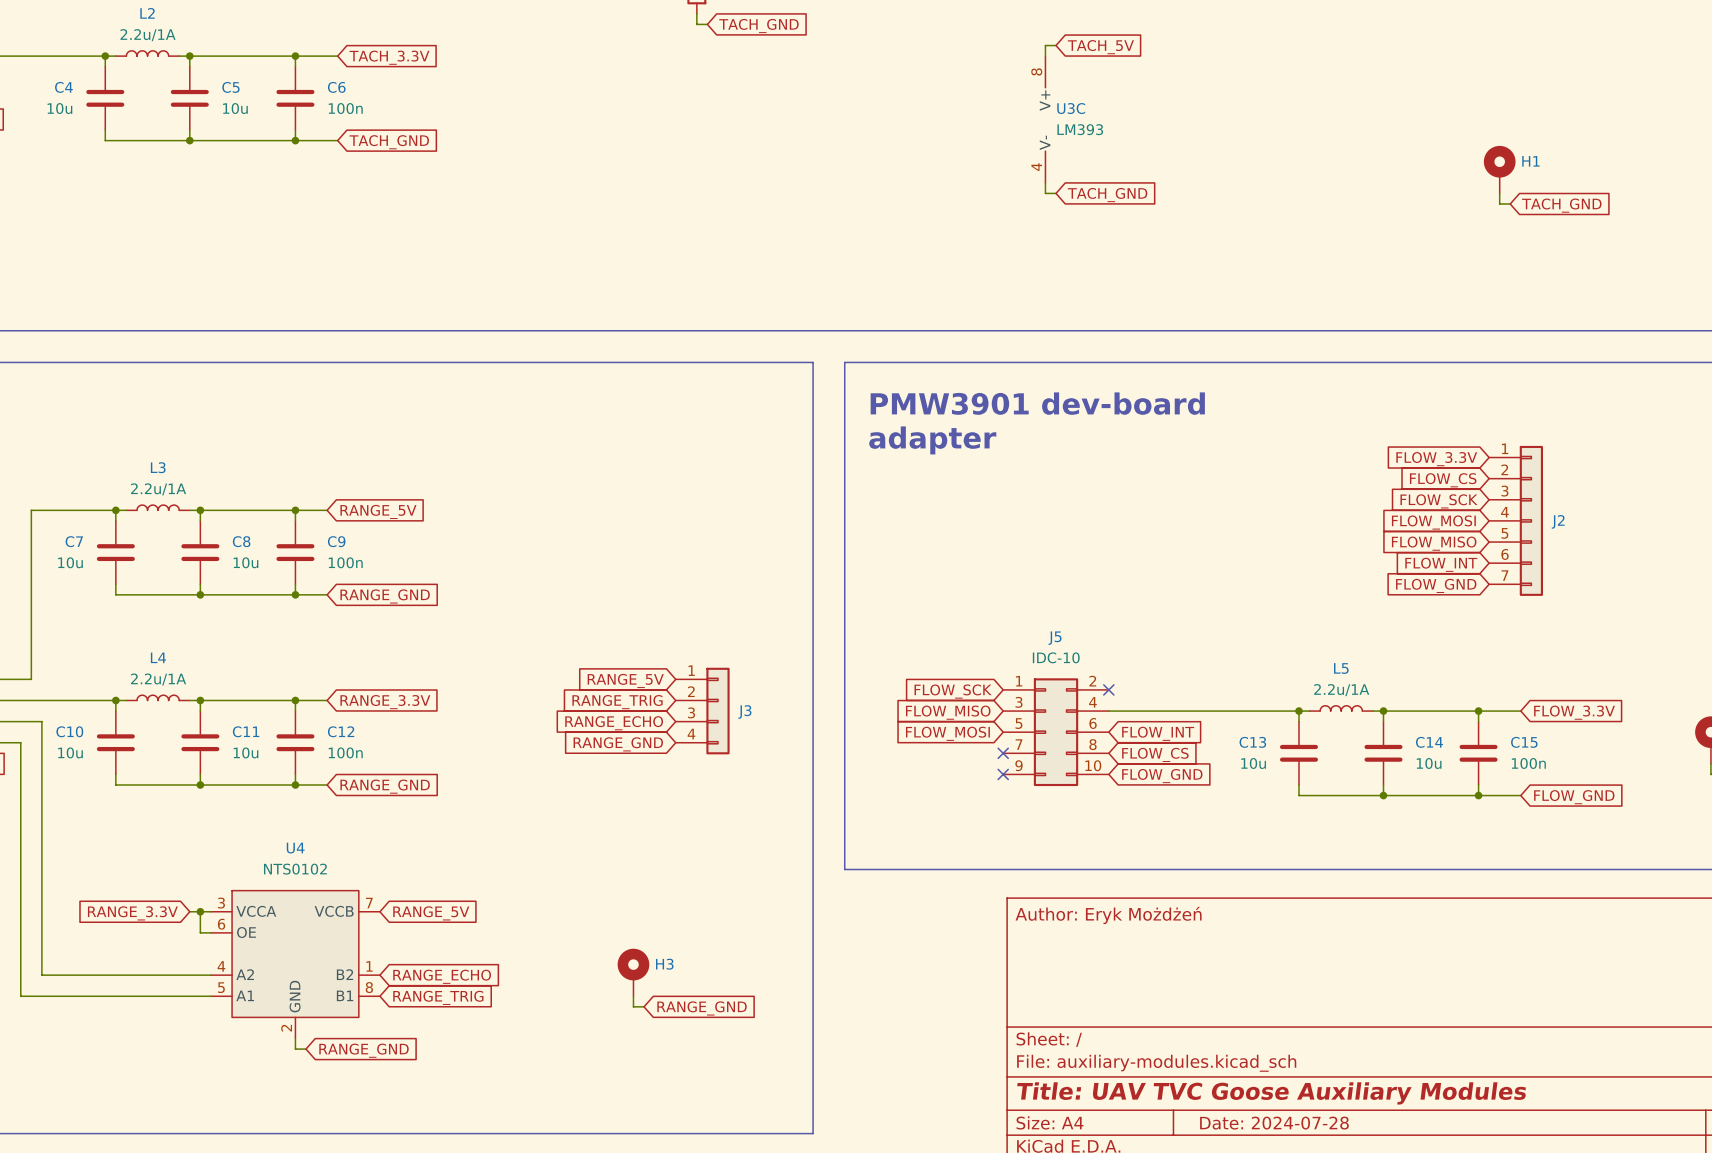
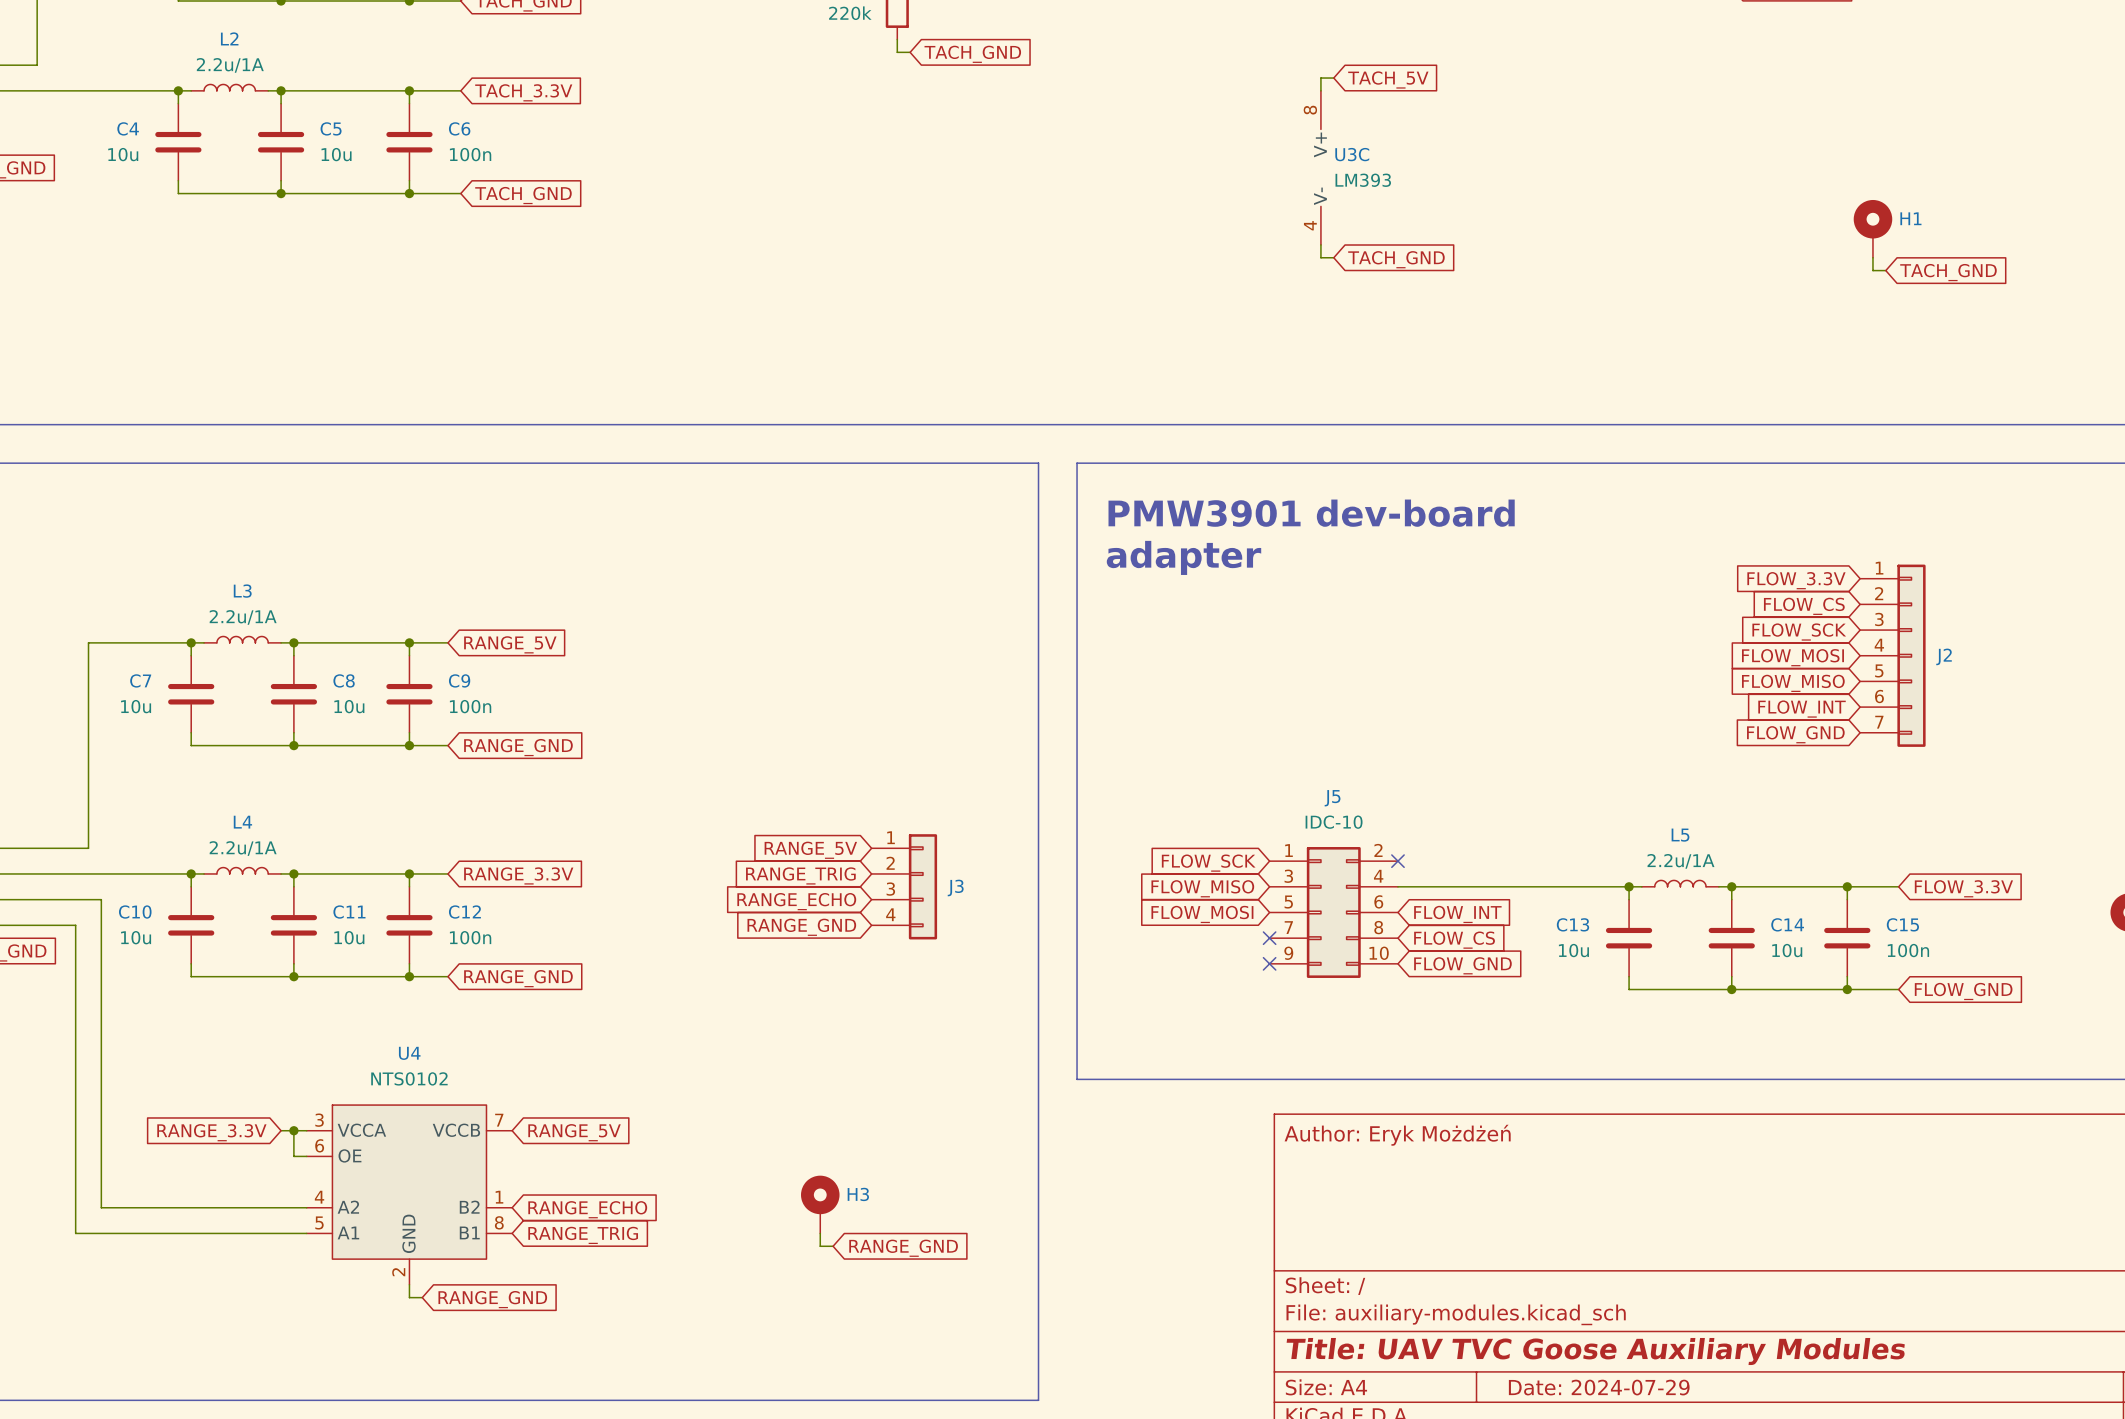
title block: Date: 2024-07-28 (1274, 1123) -> Date: 2024-07-29 (1599, 1387)

